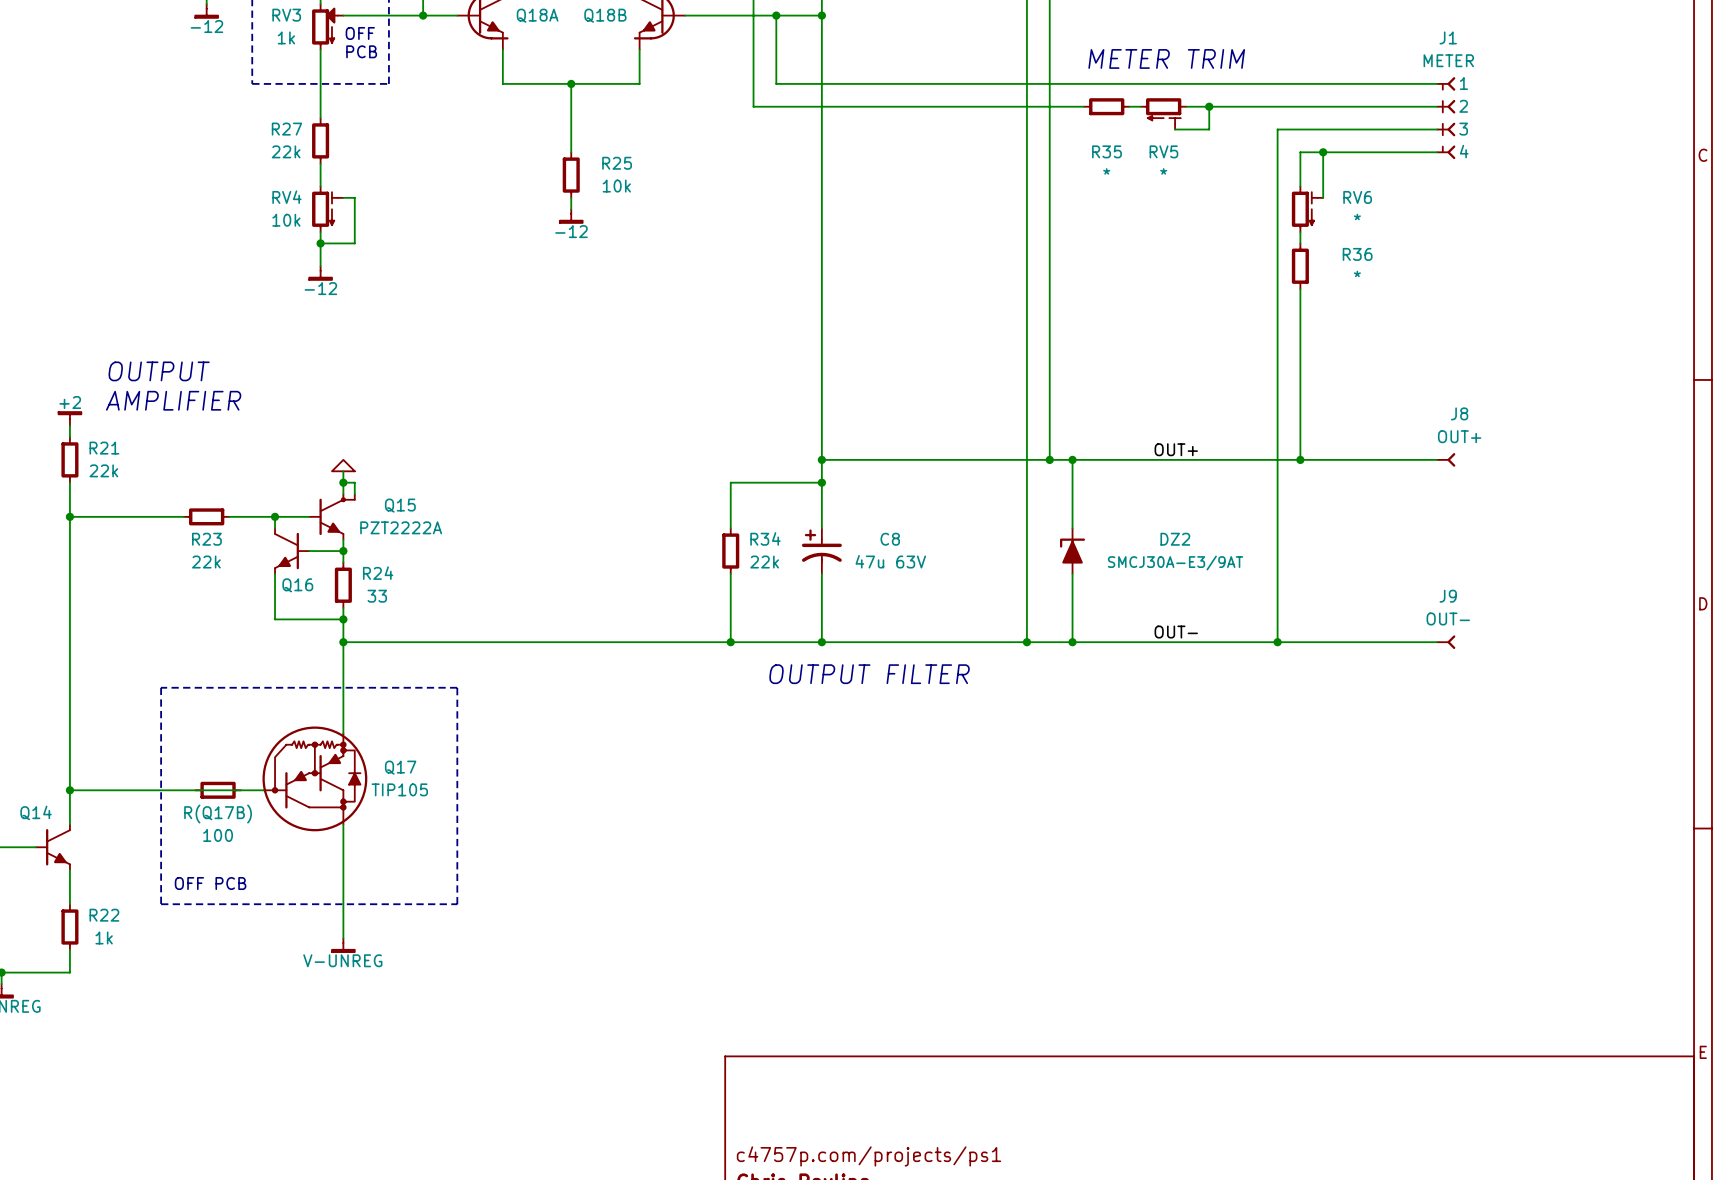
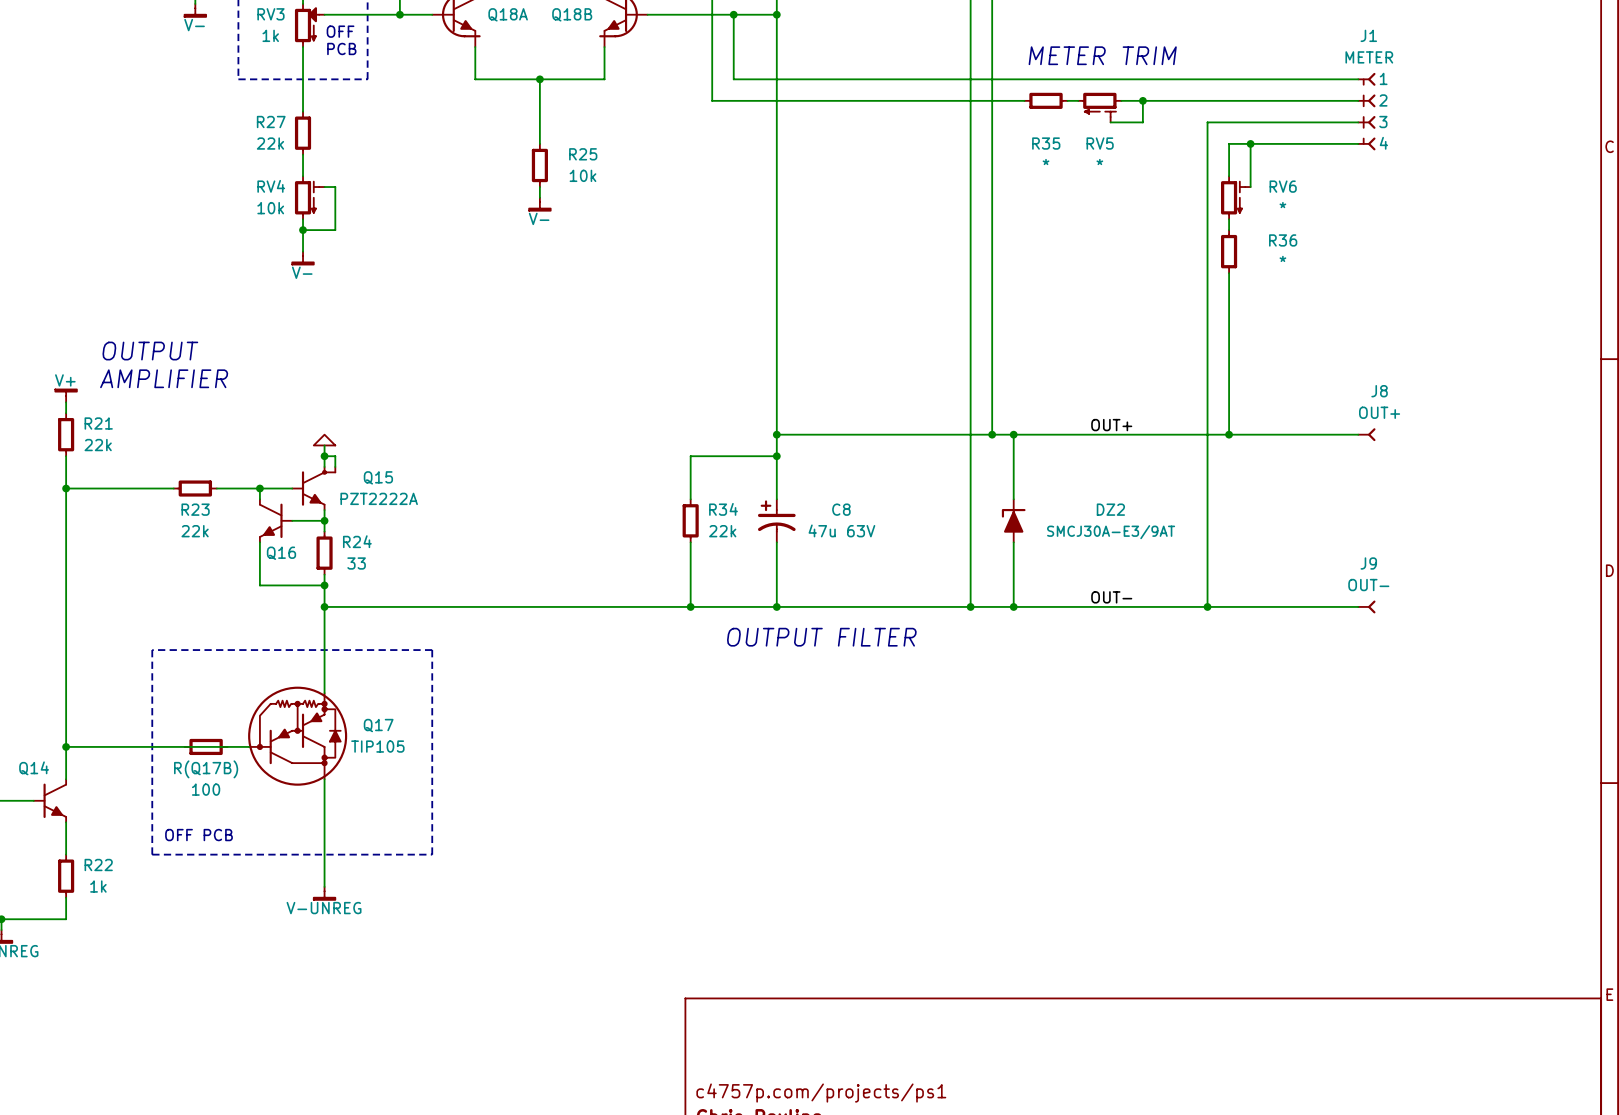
power symbol: -12 (206, 11) -> V- (195, 10)
power symbol: -12 (571, 216) -> V- (539, 204)
power symbol: -12 (320, 273) -> V- (303, 258)
power symbol: +2 (69, 418) -> V+ (66, 395)

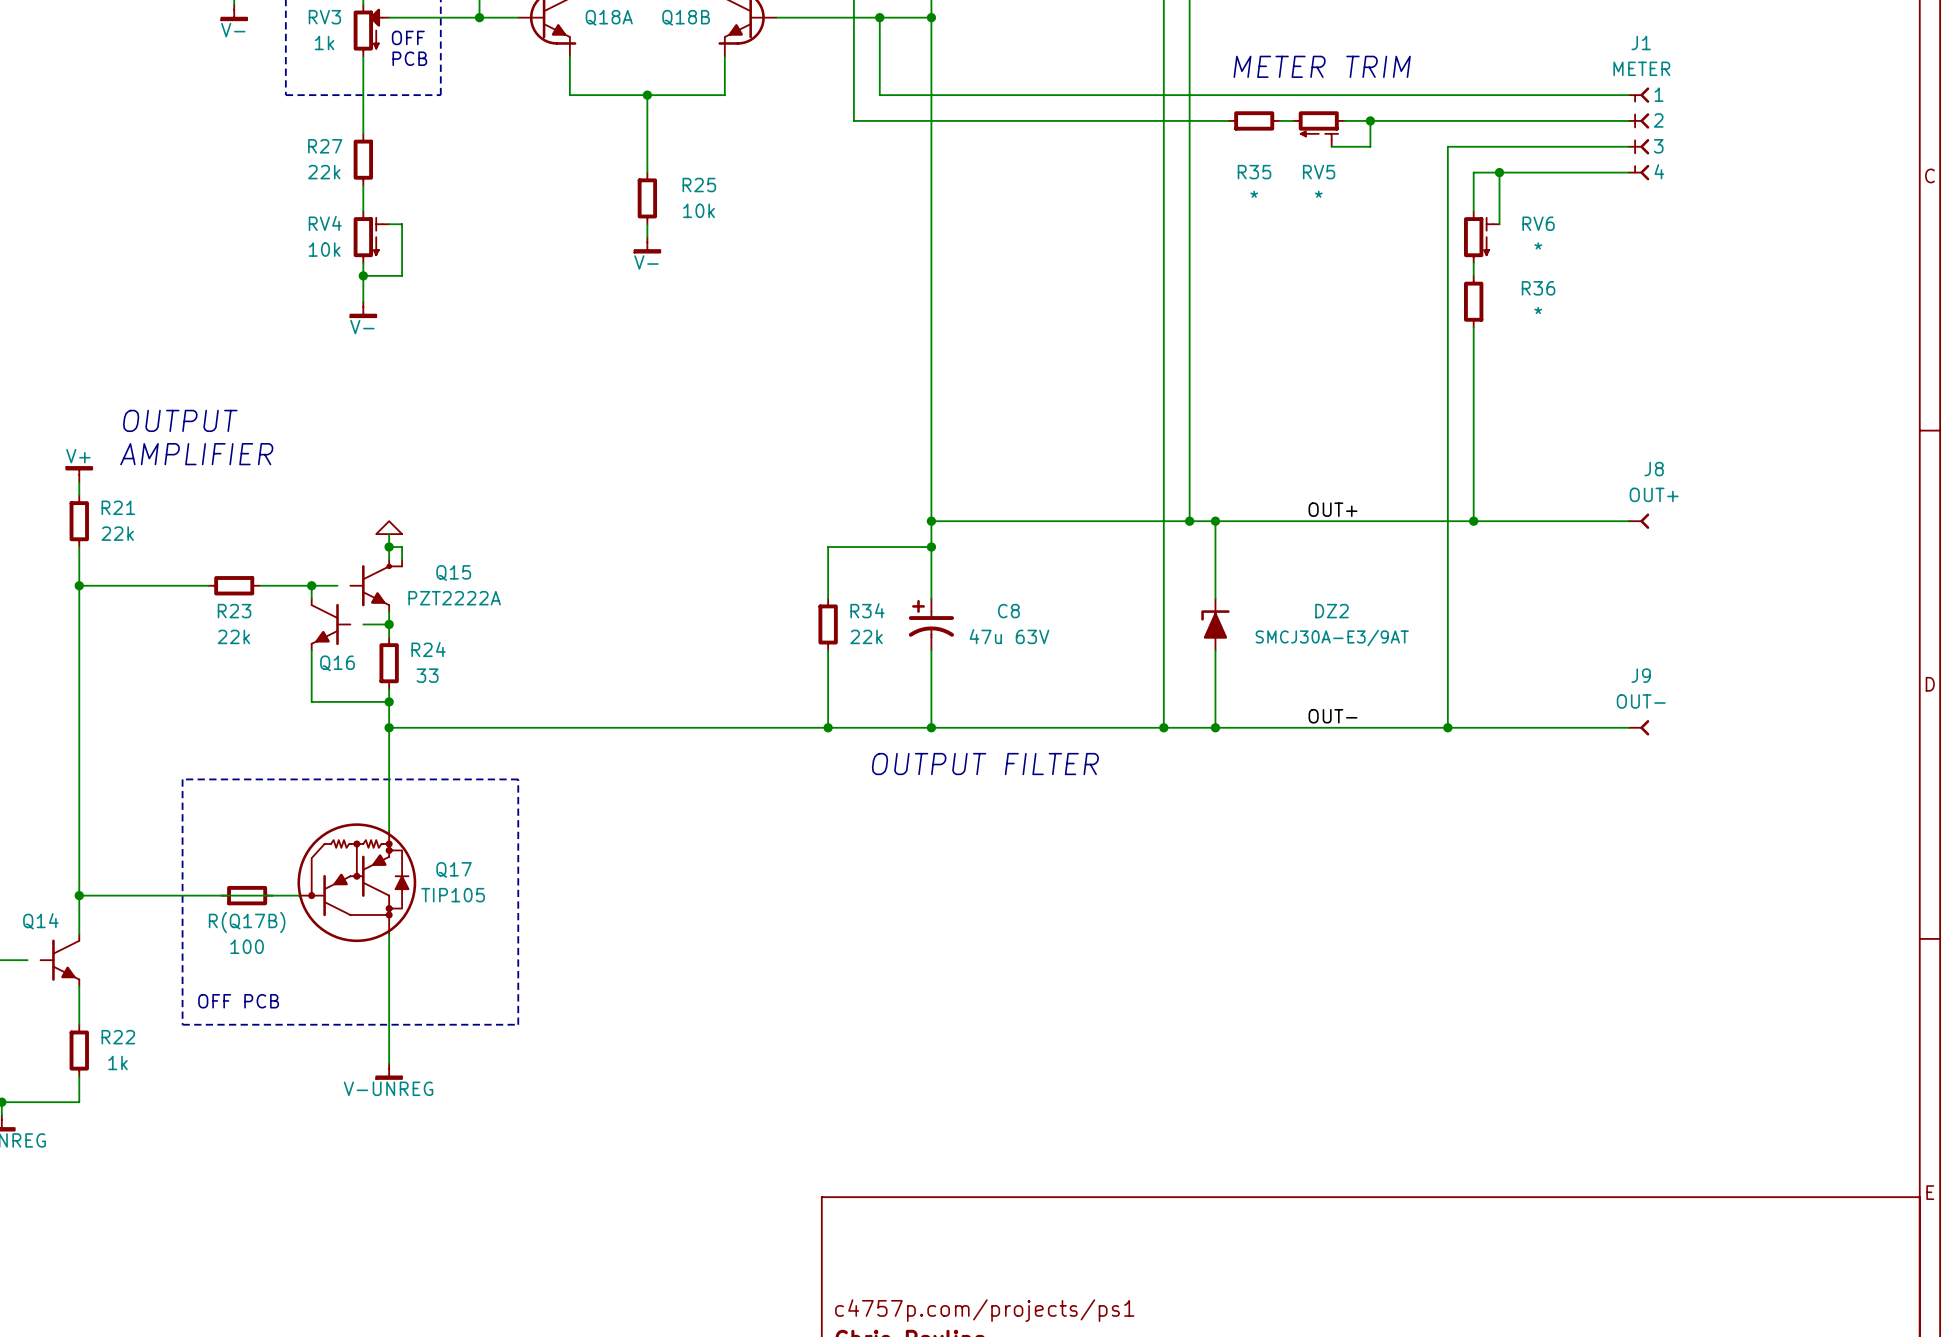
wire: (281, 488) (292, 488) -> none
wire: (292, 520) (303, 520) -> none
wire: (23, 800) (33, 800) -> none

